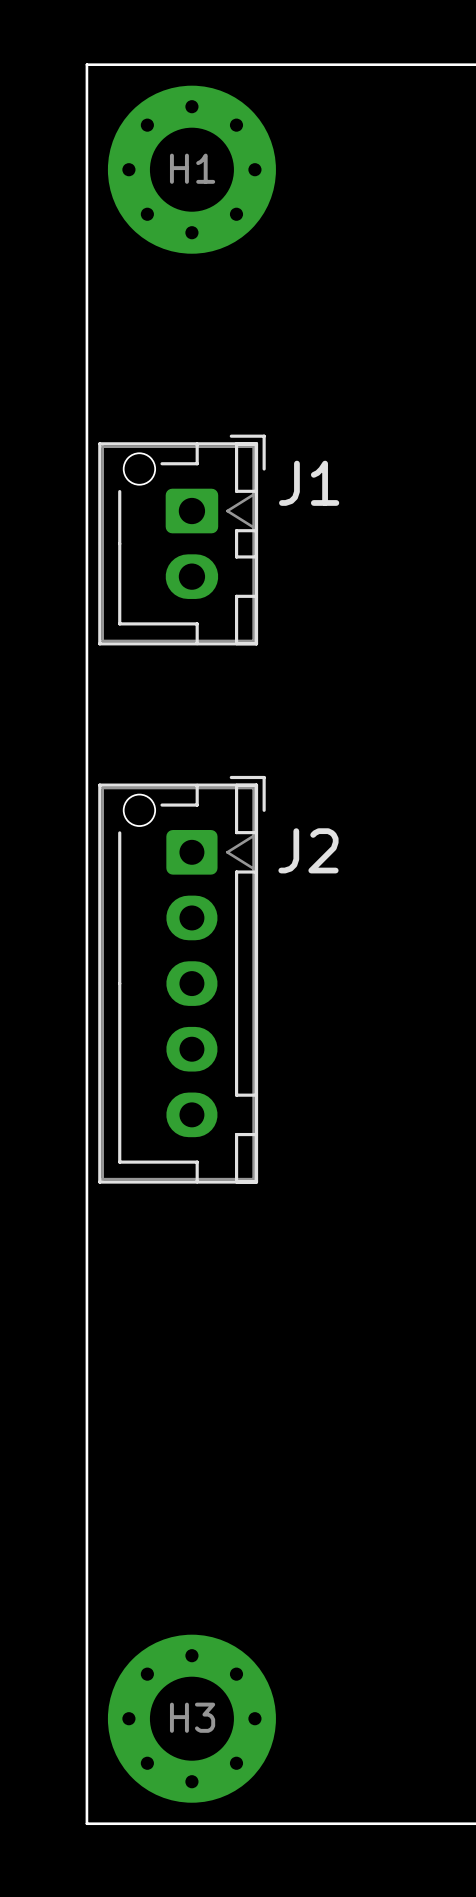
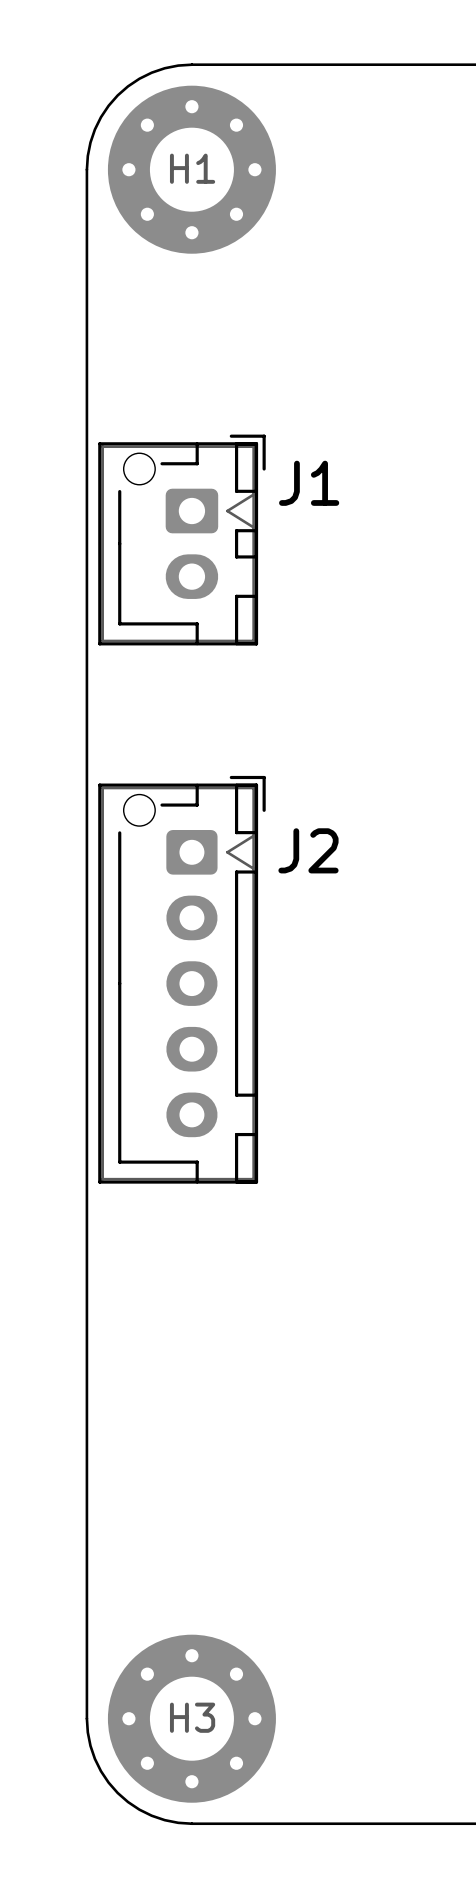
board edge: (191, 64) (86, 64) (86, 169) -> (191, 64) (164, 68) (151, 72) (128, 86) (117, 95) (100, 117) (94, 129) (90, 142) (86, 169)
board edge: (86, 1718) (86, 1823) (191, 1823) -> (86, 1718) (87, 1732) (94, 1758) (100, 1771) (117, 1792) (128, 1802) (151, 1815) (164, 1820) (191, 1823)

